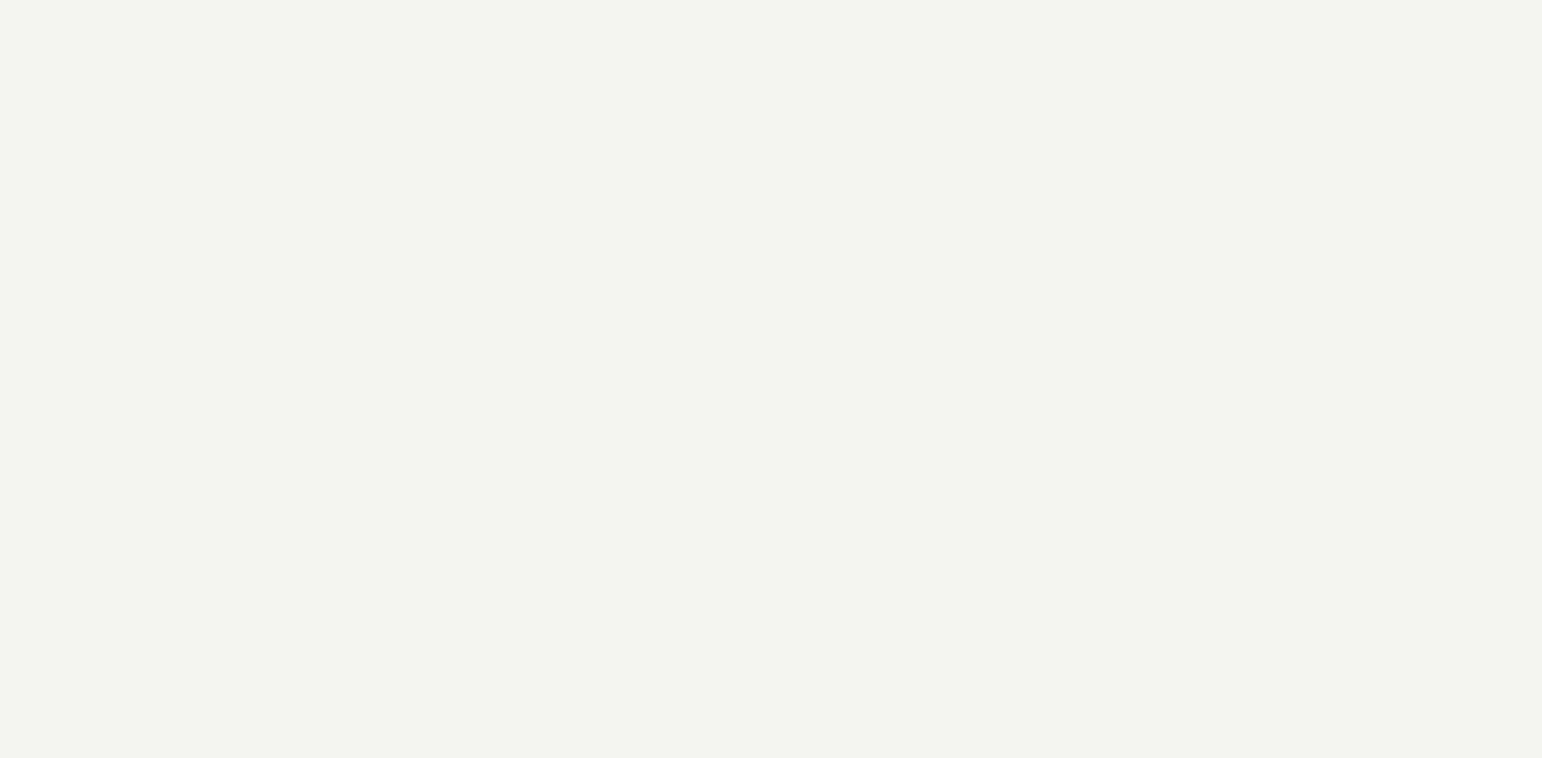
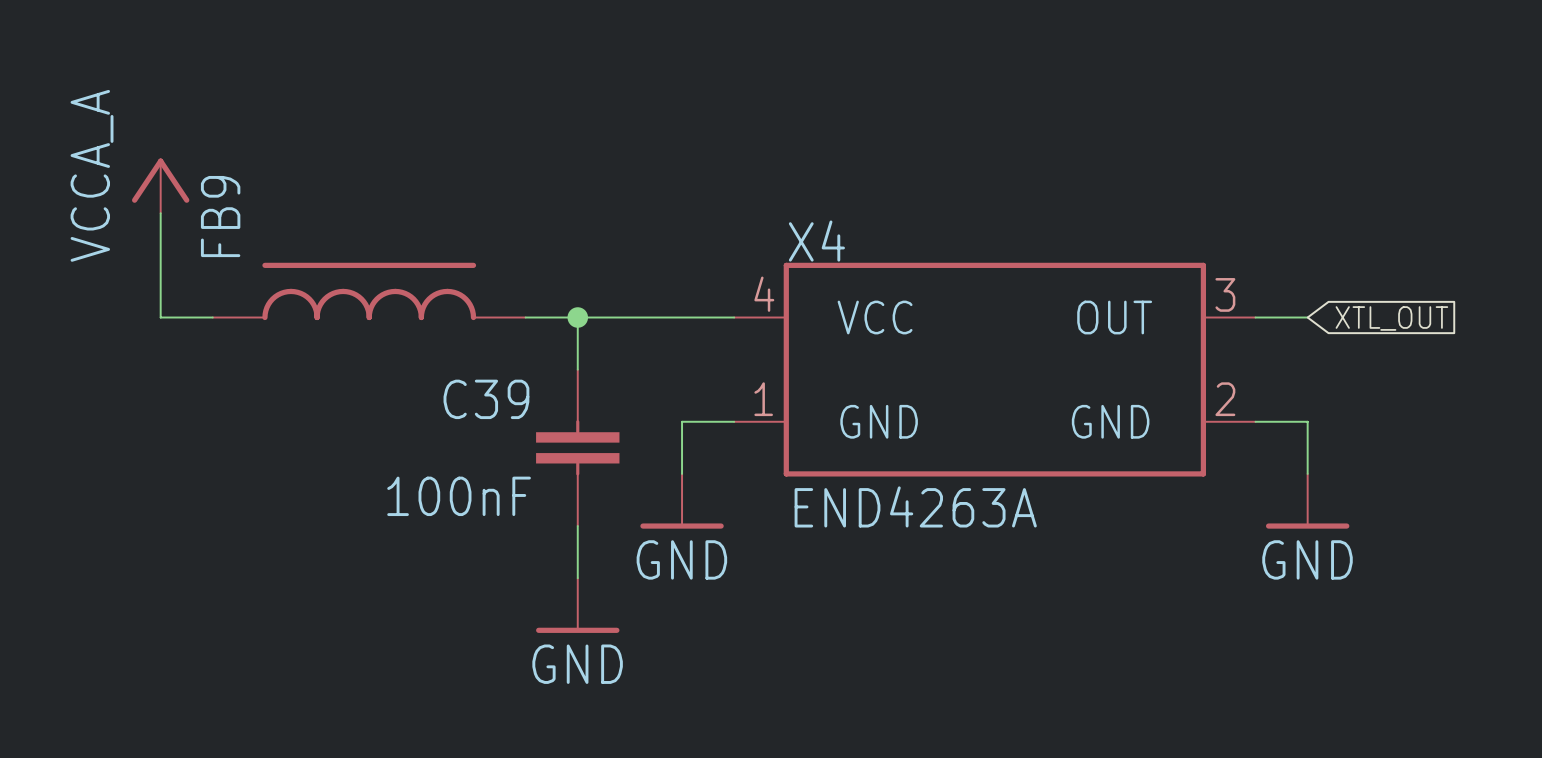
power symbol: none -> VCCA_A (160, 185)
wire: none -> (160, 213) (160, 317) (212, 317)
FB9: none -> (369, 291)
wire: none -> (525, 317) (734, 317)
wire: none -> (577, 317) (577, 369)
junction: none -> (577, 317)
wire: none -> (1255, 317) (1307, 317)
global label: none -> XTL_OUT (1391, 318)
X4: none -> END4263A (994, 369)
wire: none -> (734, 421) (682, 421) (682, 473)
wire: none -> (1255, 421) (1307, 421) (1307, 473)
C39: none -> 100nF (577, 447)
power symbol: none -> GND (682, 501)
power symbol: none -> GND (1307, 501)
wire: none -> (577, 526) (577, 578)
power symbol: none -> GND (577, 605)

